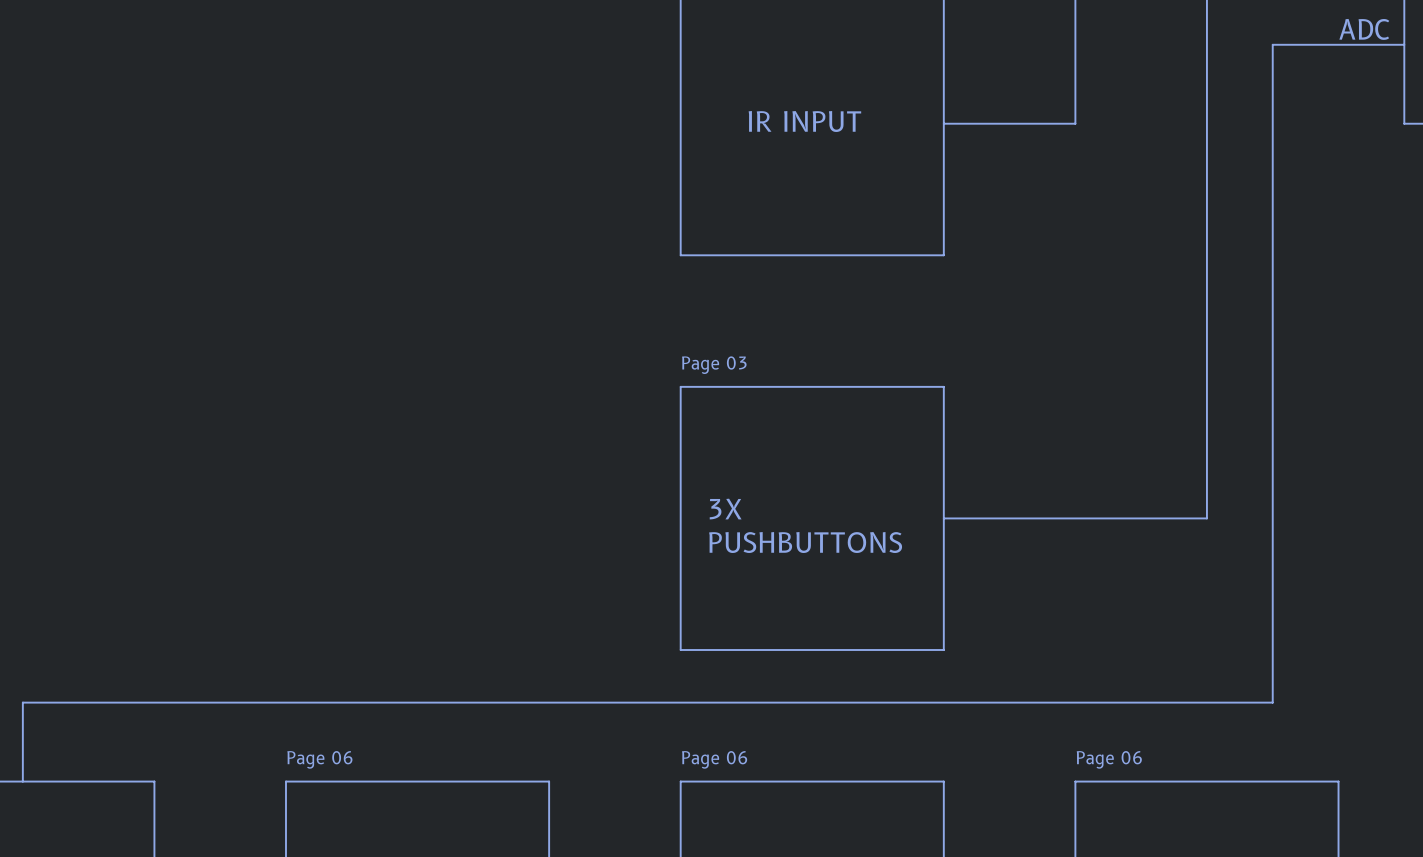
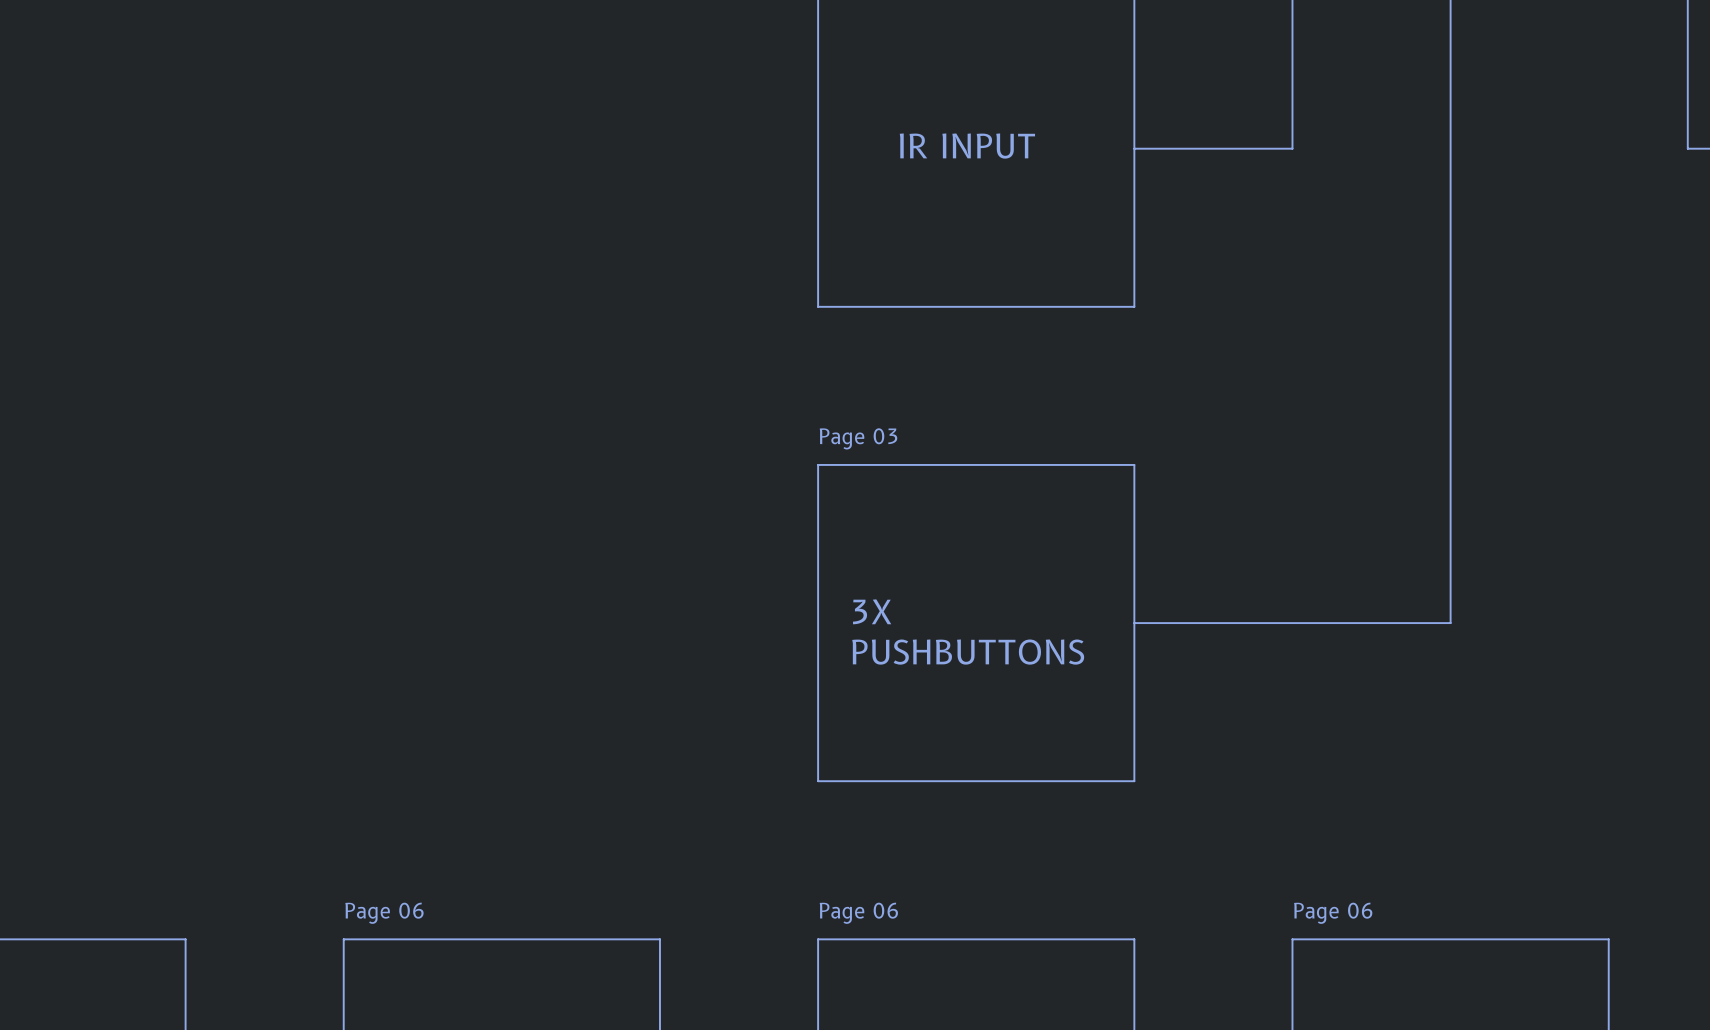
text: ADC (1364, 29) -> none
line: (1404, 44) (1272, 44) (1272, 702) (22, 702) (22, 781) -> none

